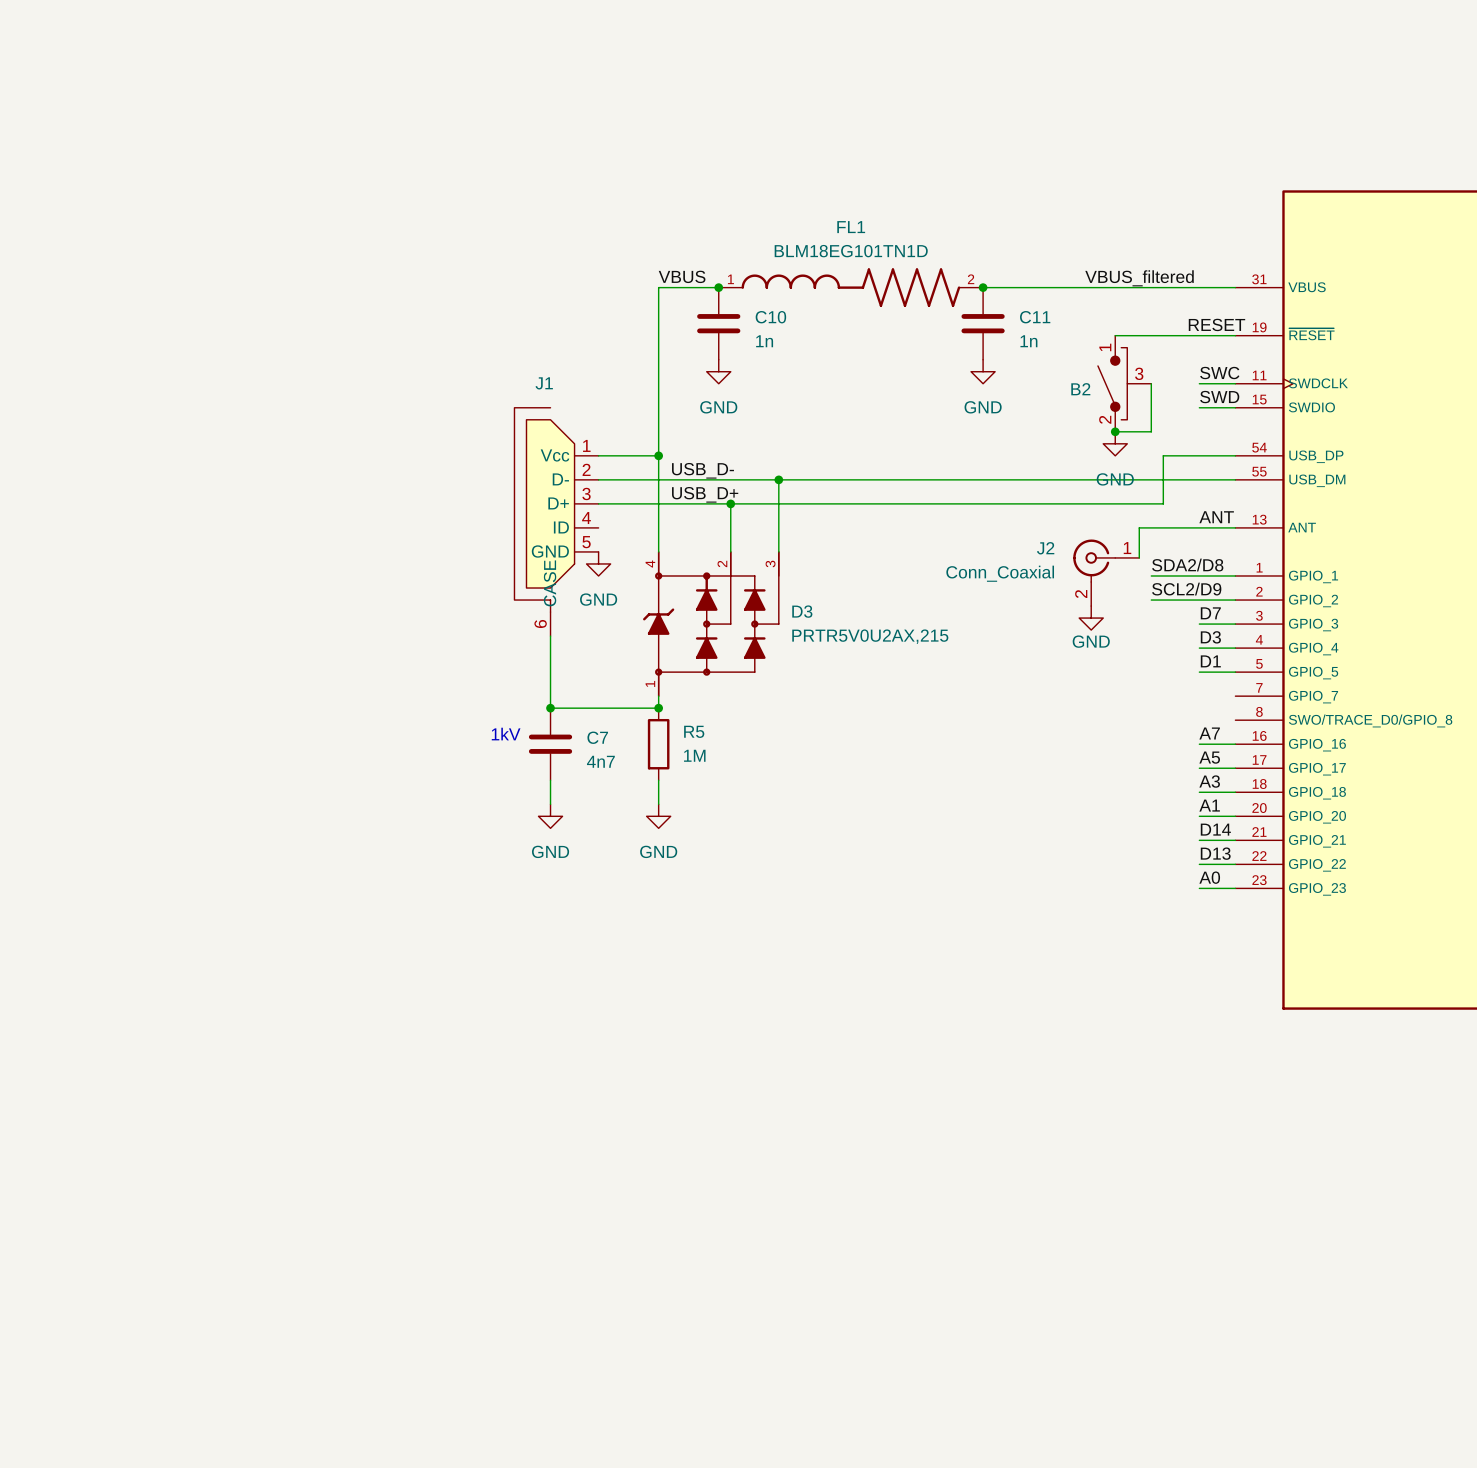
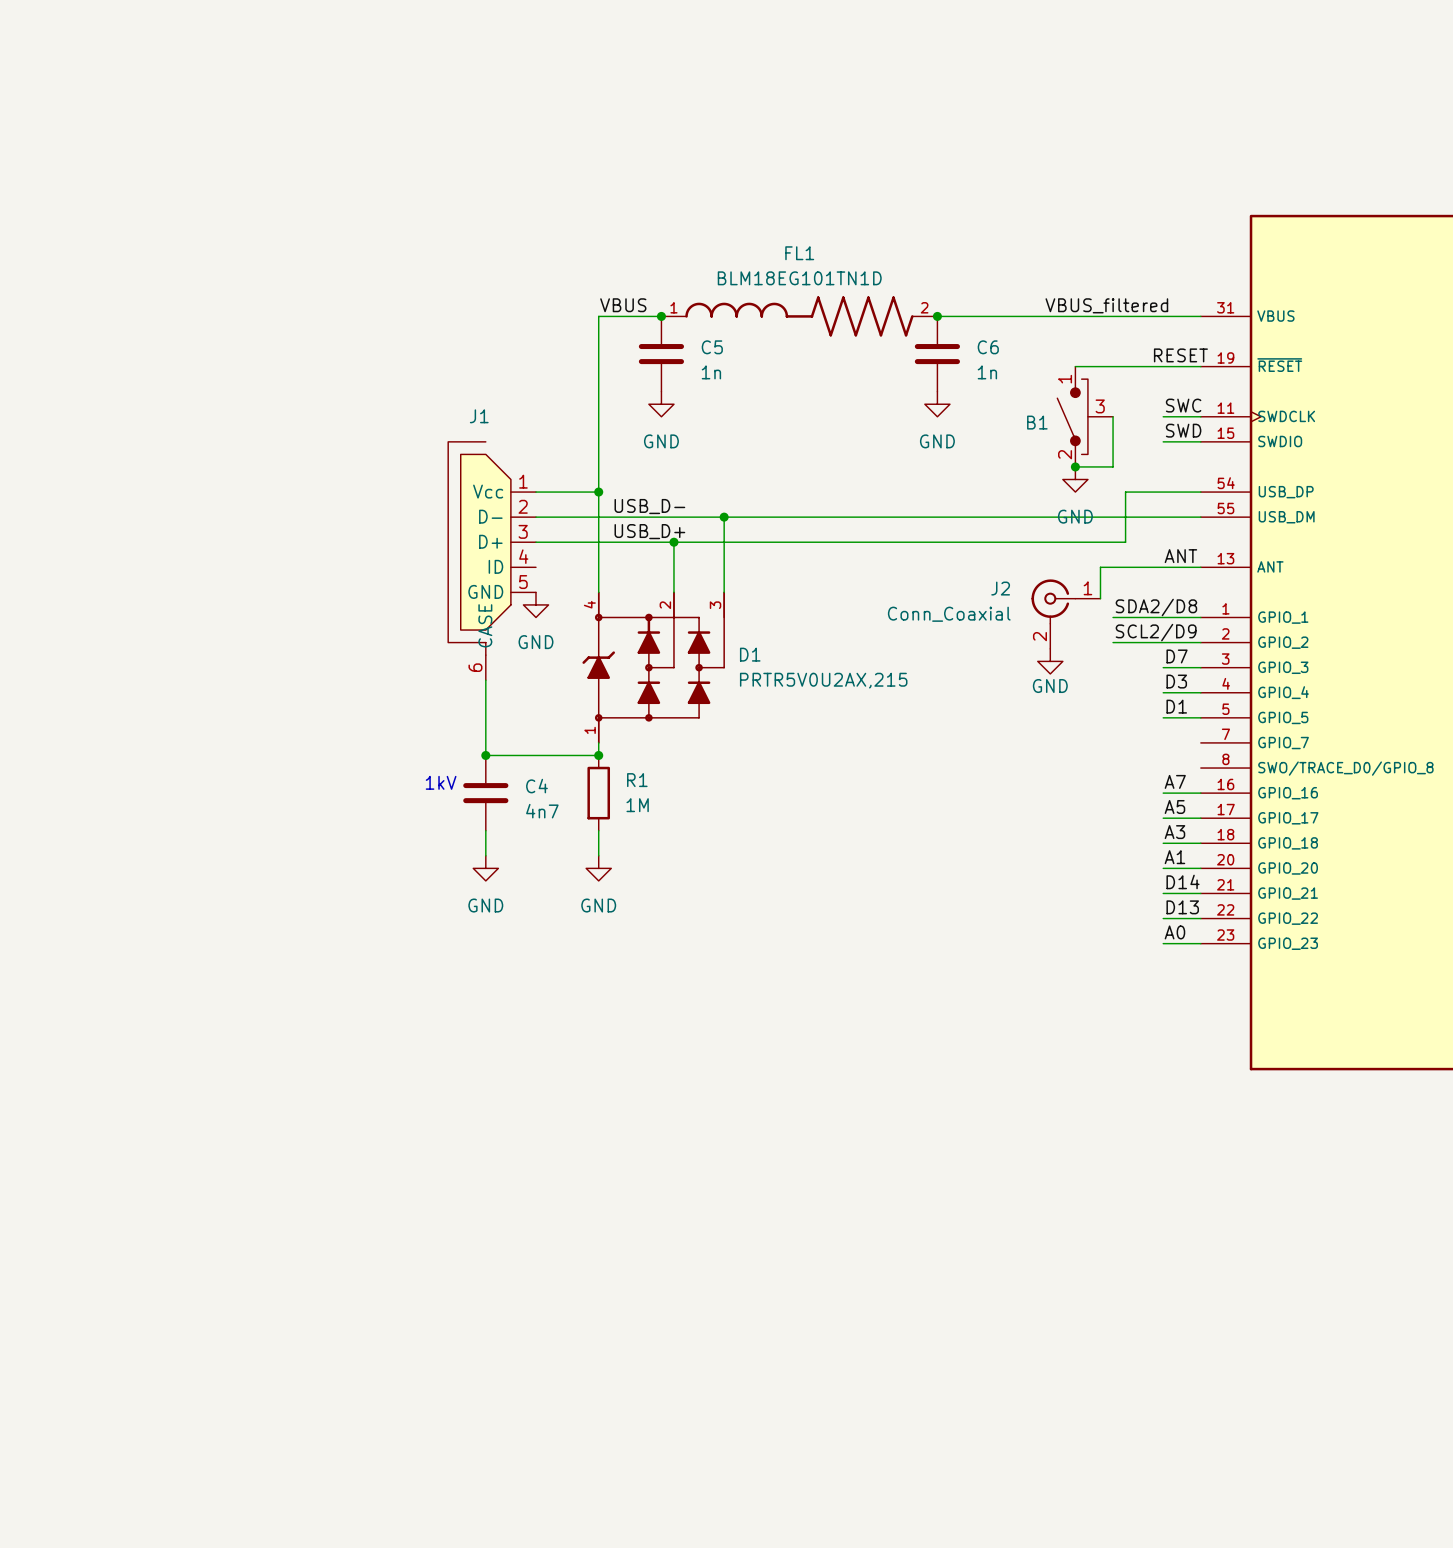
C10 name: C10 (770, 317) -> C5 (712, 347)
C11 name: C11 (1035, 317) -> C6 (988, 347)
B2 name: B2 (1080, 389) -> B1 (1037, 422)
D3 name: D3 (802, 611) -> D1 (750, 654)
R5 name: R5 (694, 731) -> R1 (637, 780)
C7 name: C7 (597, 737) -> C4 (536, 786)

